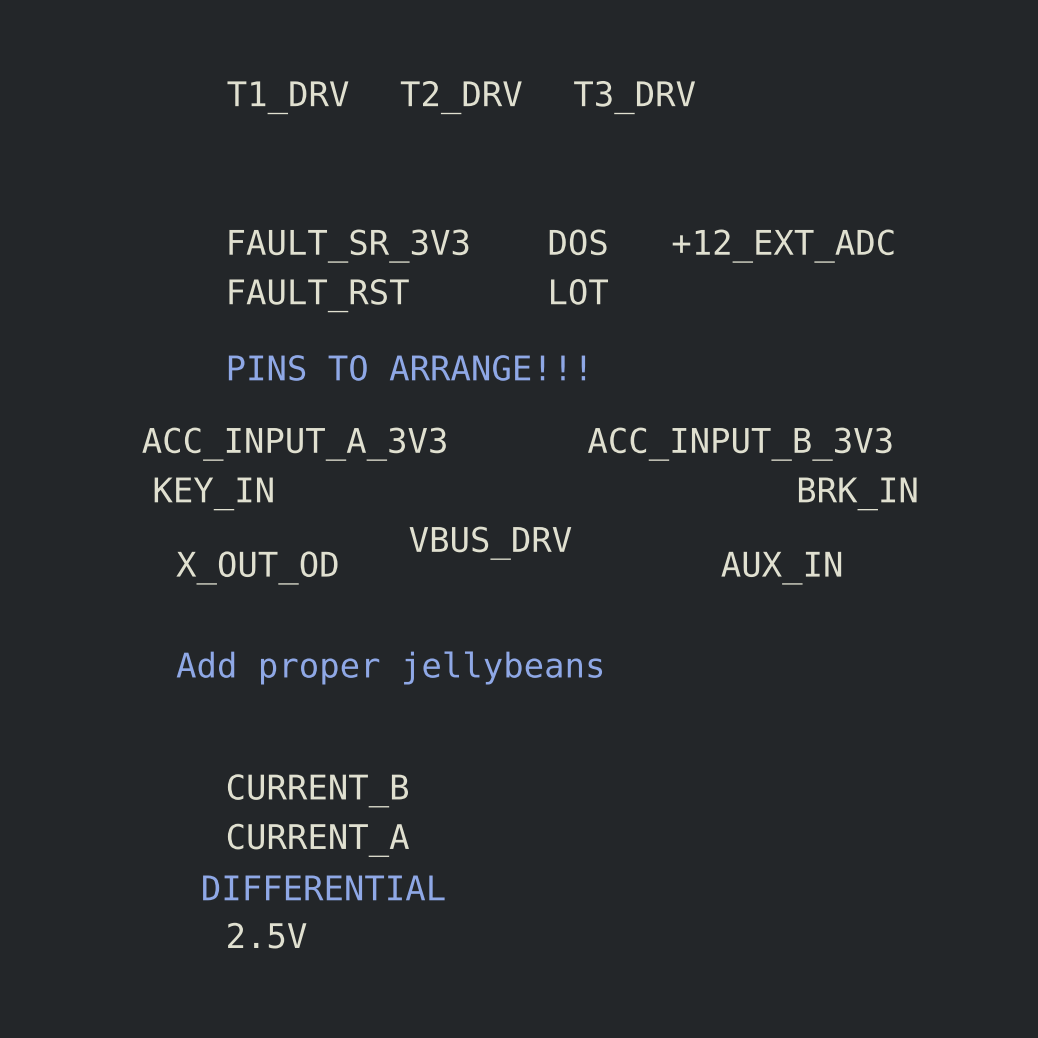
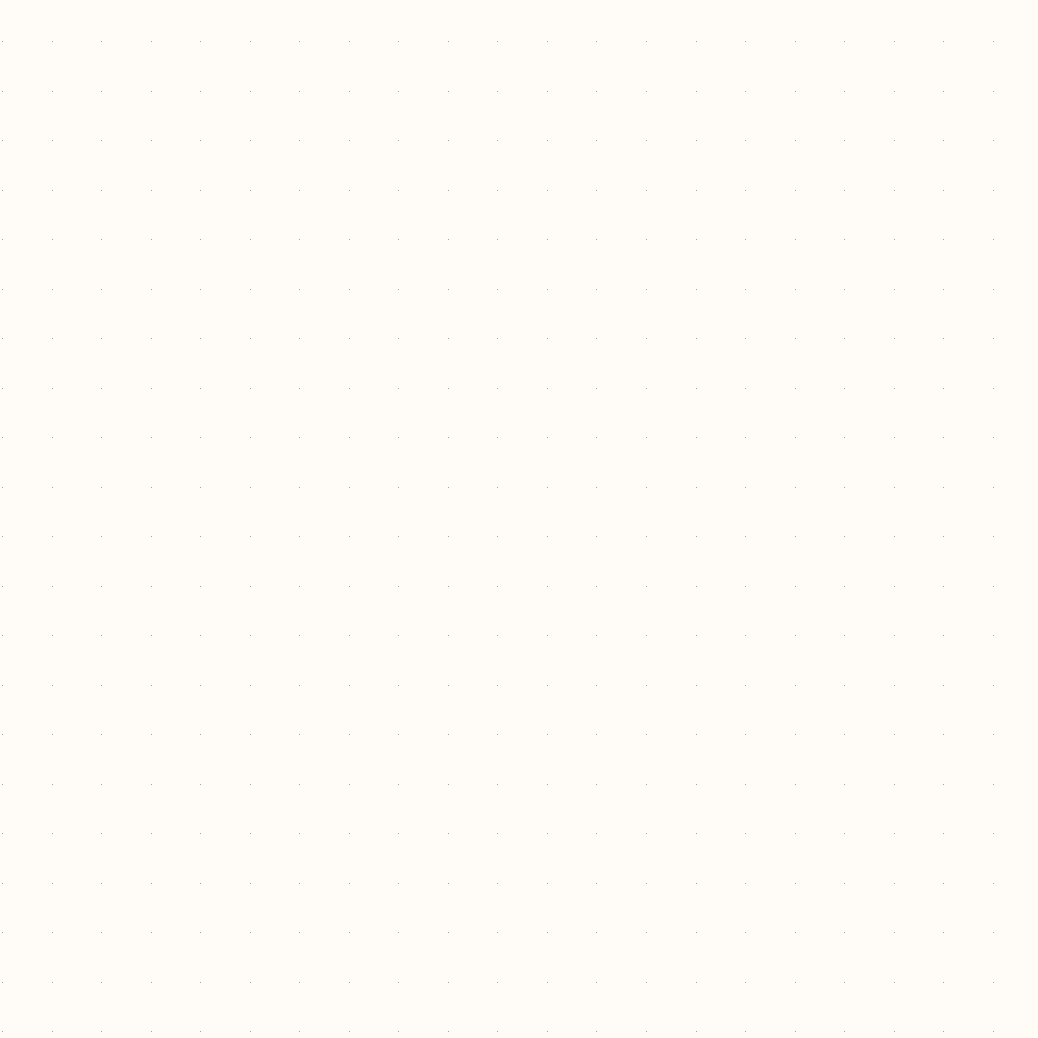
label: T1_DRV (287, 97) -> none
label: T2_DRV (461, 97) -> none
label: T3_DRV (634, 97) -> none
label: DOS (578, 242) -> none
label: FAULT_SR_3V3 (348, 246) -> none
label: +12_EXT_ADC (783, 246) -> none
label: LOT (579, 291) -> none
label: FAULT_RST (319, 295) -> none
text: PINS TO ARRANGE!!! (406, 367) -> none
label: ACC_INPUT_A_3V3 (294, 444) -> none
label: ACC_INPUT_B_3V3 (739, 444) -> none
label: KEY_IN (213, 493) -> none
label: BRK_IN (857, 493) -> none
label: VBUS_DRV (490, 543) -> none
label: X_OUT_OD (256, 567) -> none
label: AUX_IN (781, 568) -> none
text: Add proper jellybeans (389, 667) -> none
label: CURRENT_B (317, 790) -> none
label: CURRENT_A (318, 840) -> none
text: DIFFERENTIAL (323, 887) -> none
label: 2.5V (267, 935) -> none

